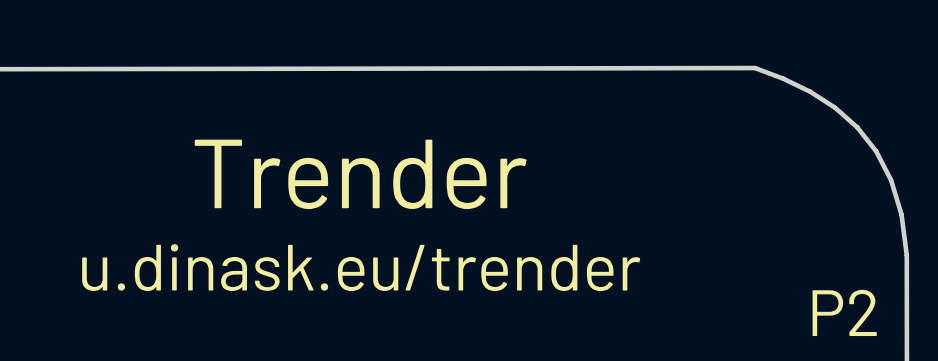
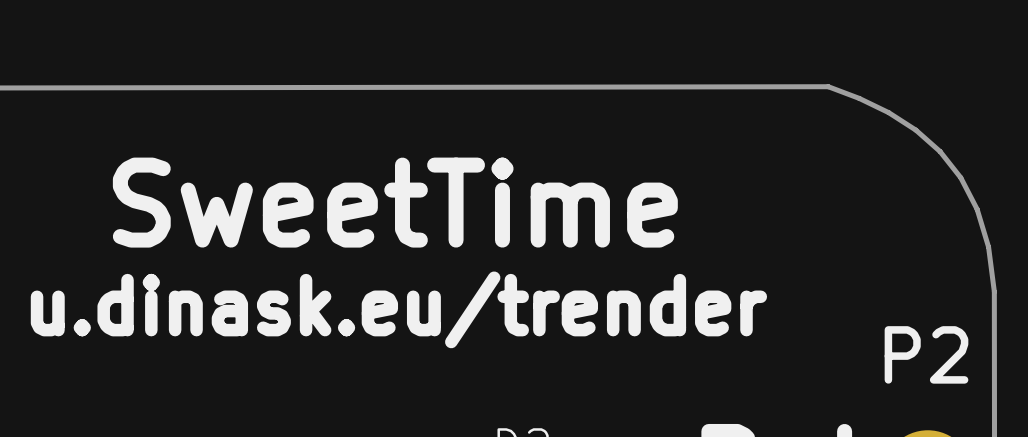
text: Trender (360, 174) -> SweetTime (395, 202)

